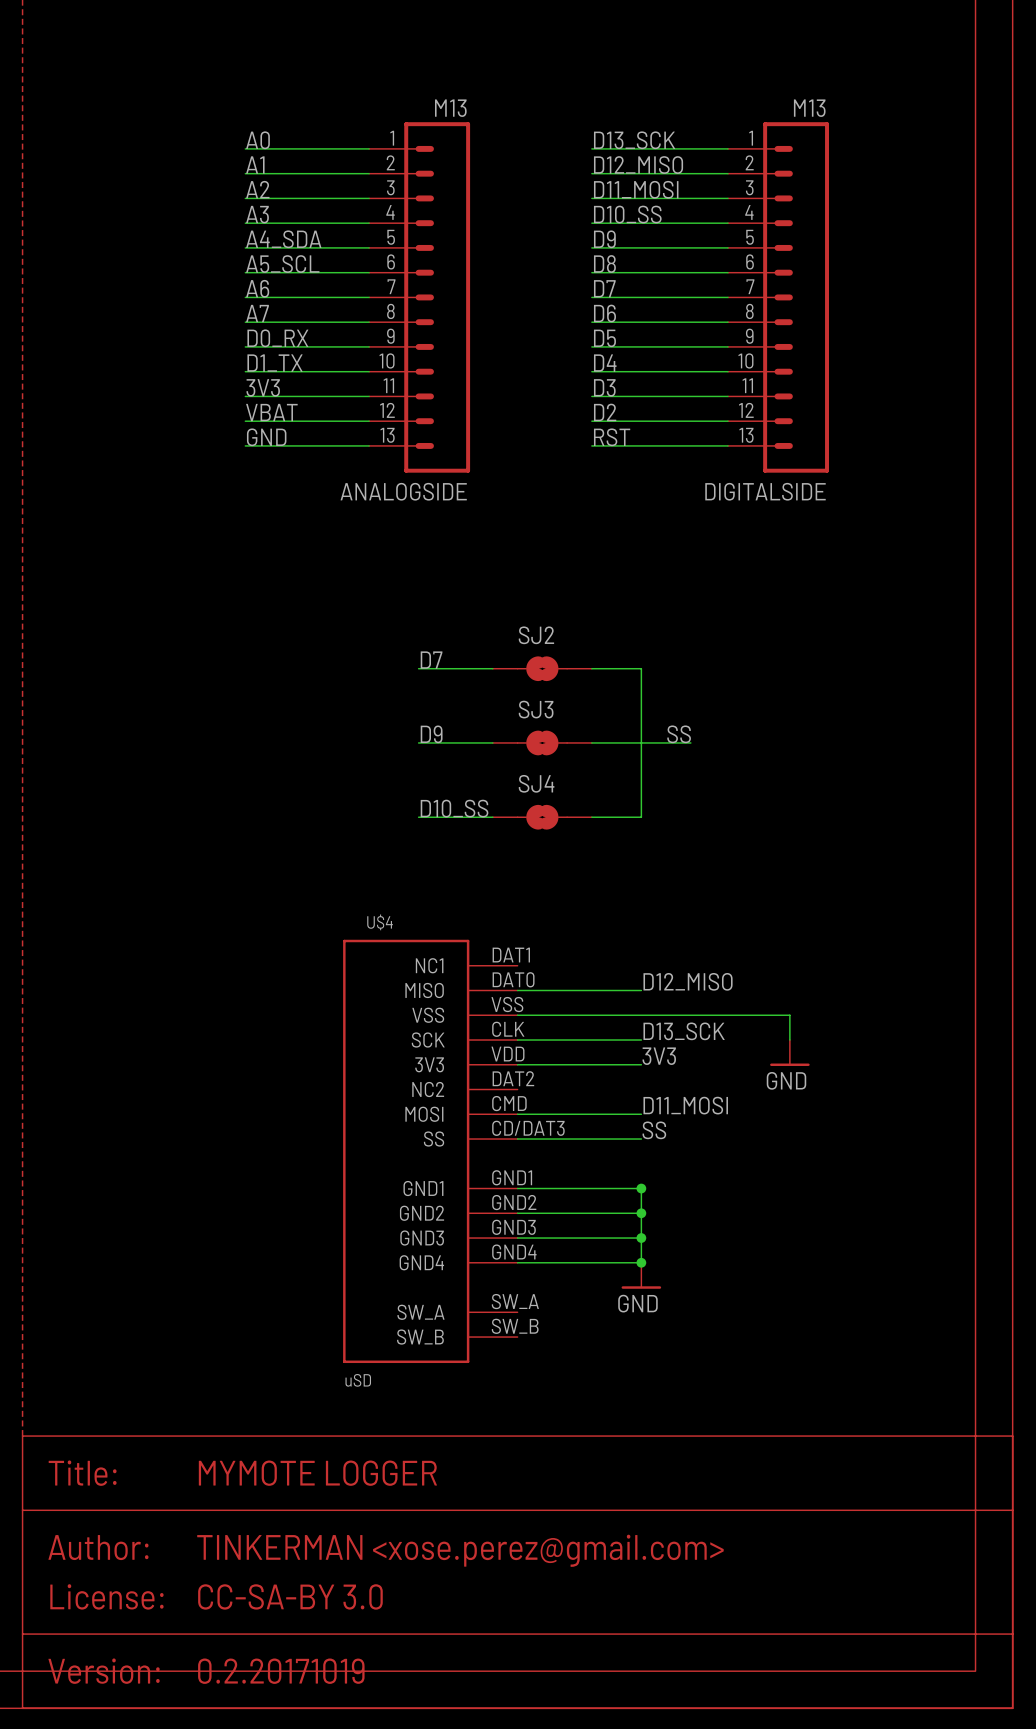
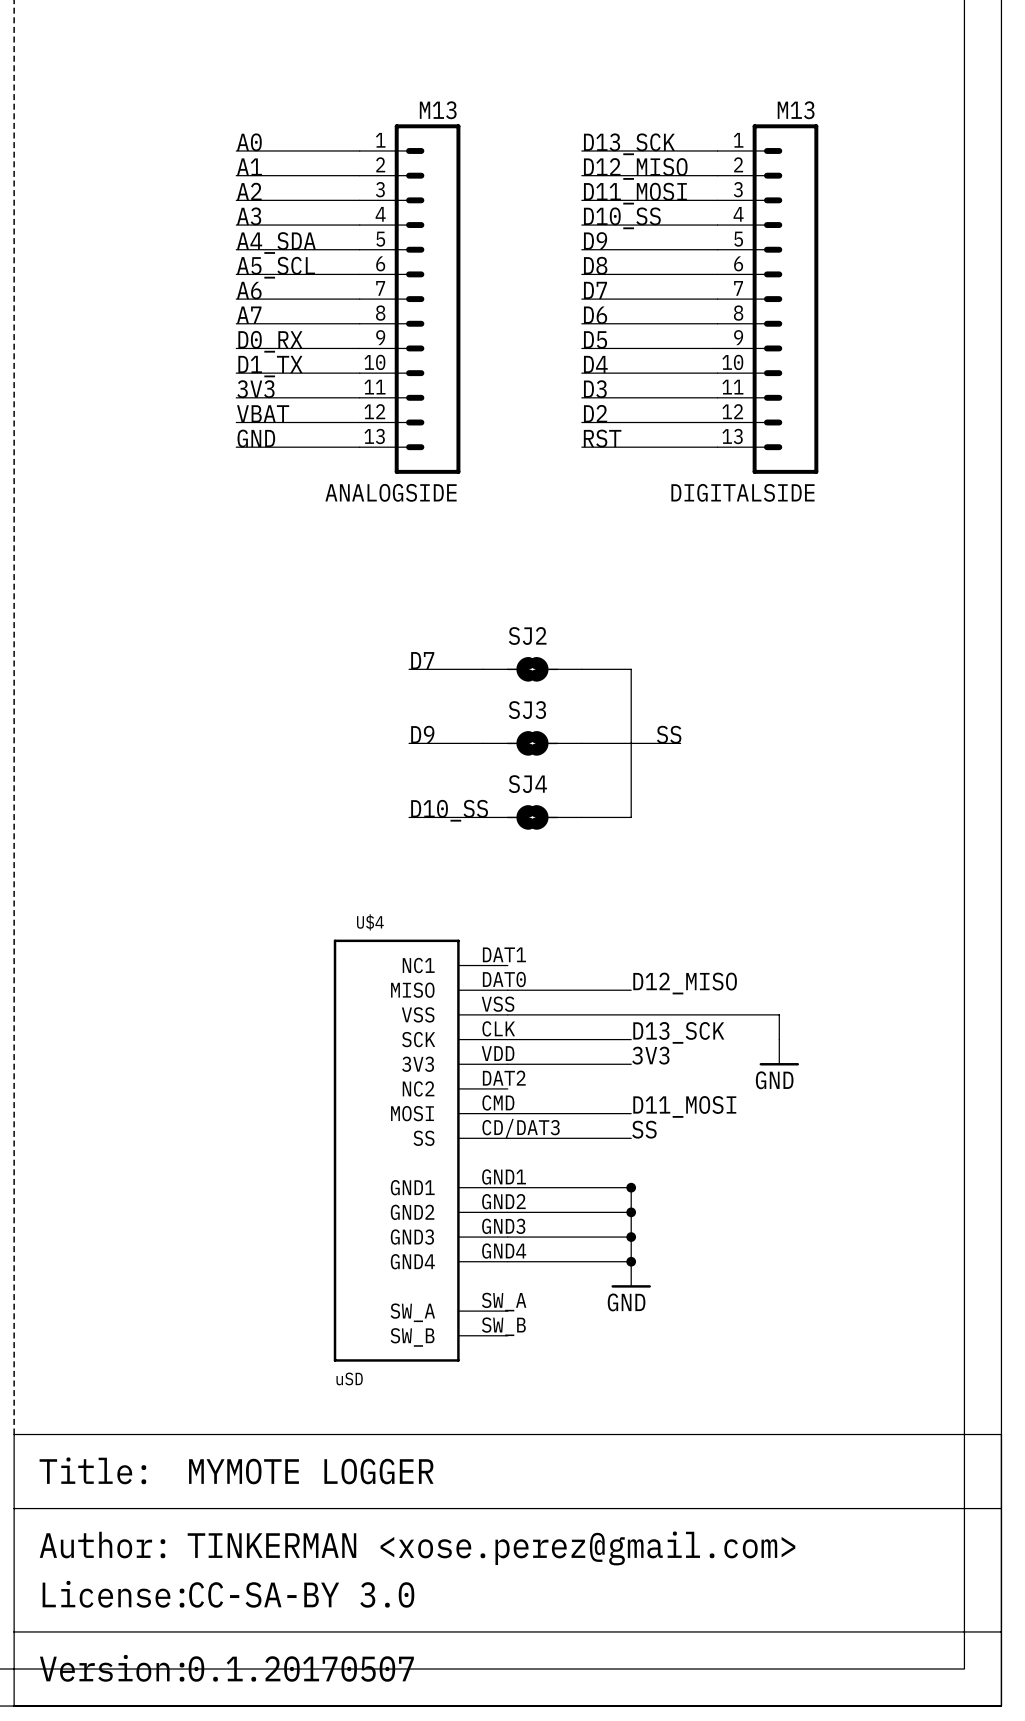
part text: 0.2.20171019 (281, 1671) -> 0.1.20170507 (301, 1669)

